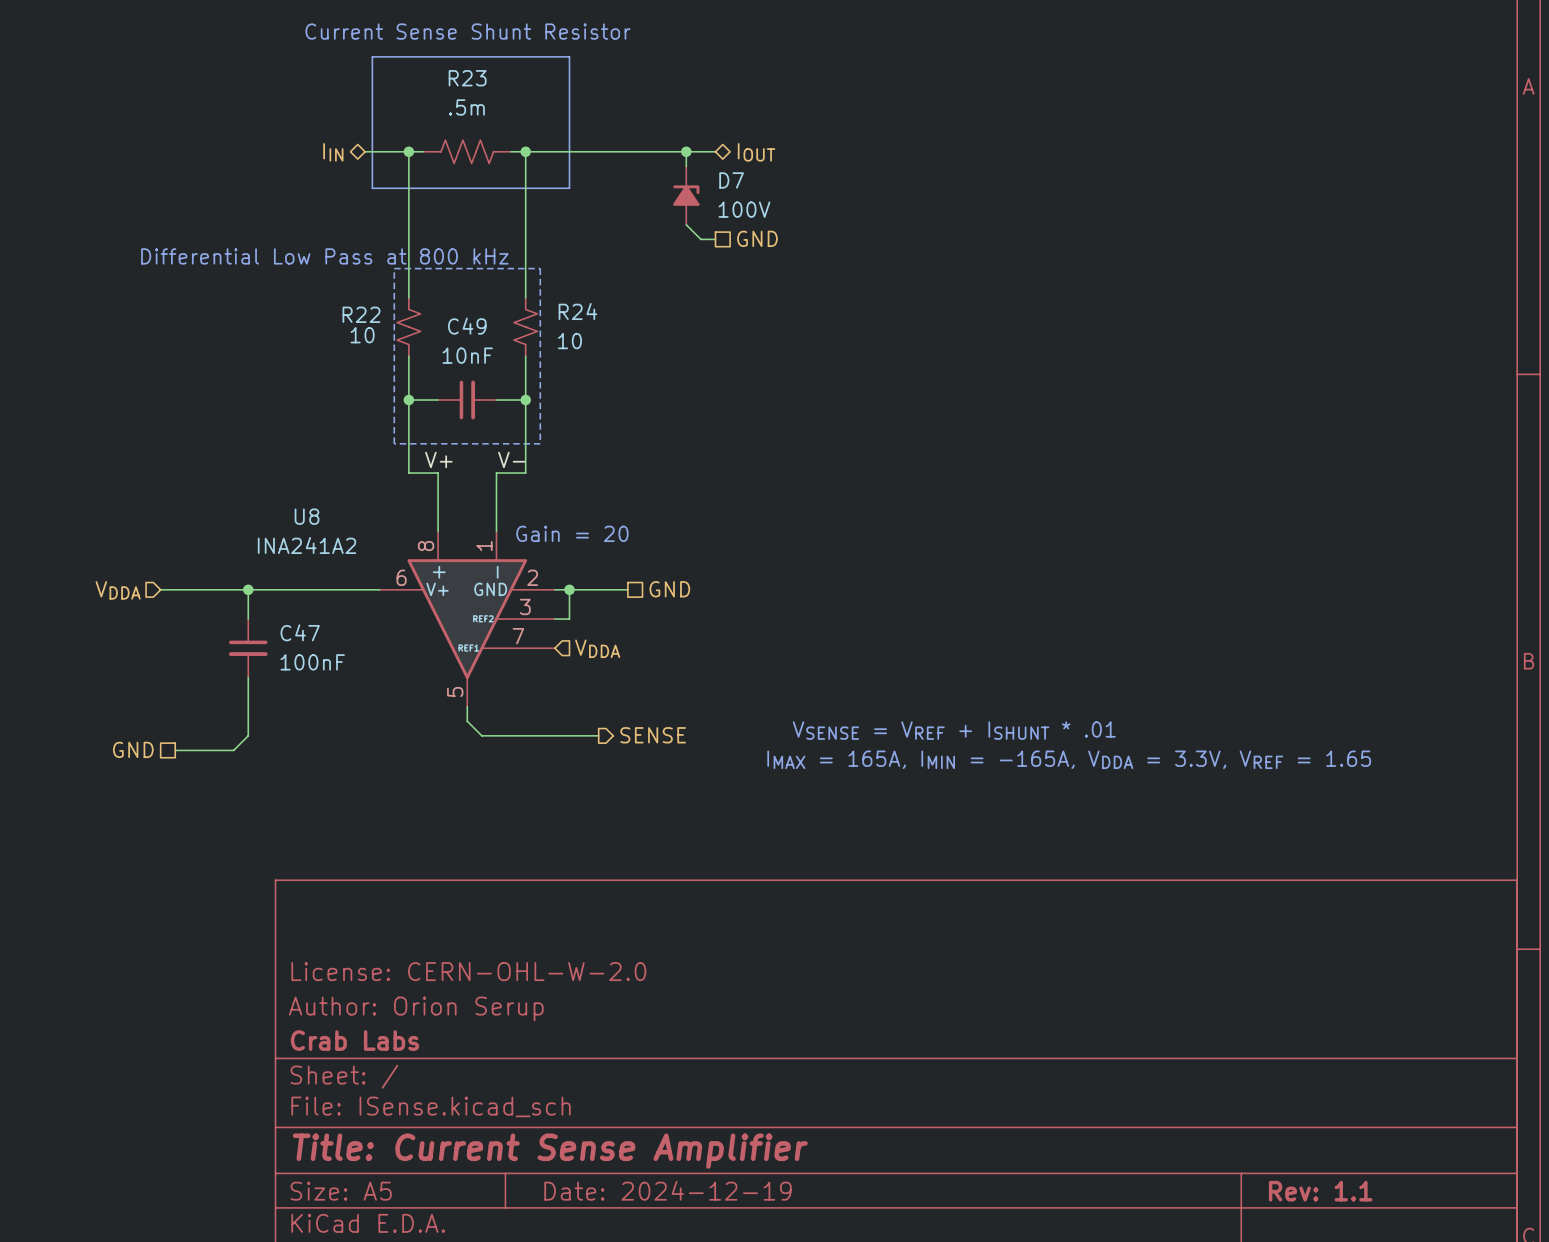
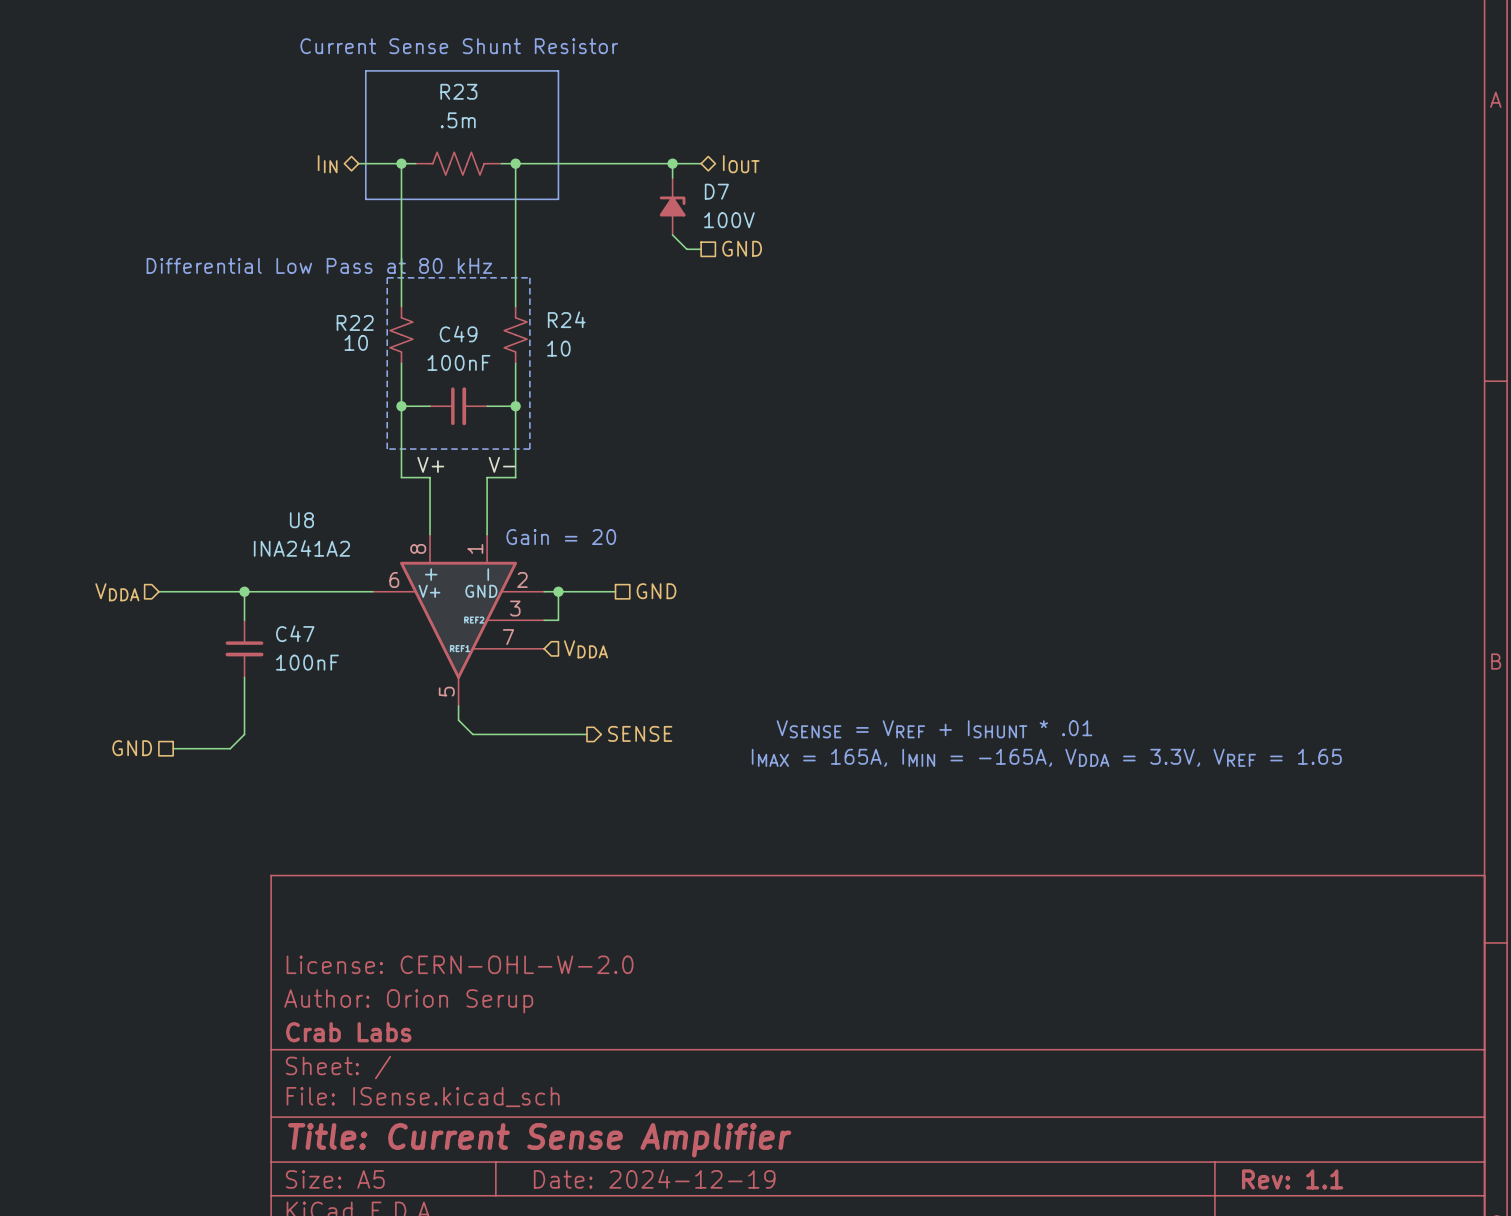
text: Differential Low Pass at 800 kHz (324, 256) -> Differential Low Pass at 80 kHz (319, 265)
C49 value: 10nF (467, 355) -> 100nF (458, 362)

